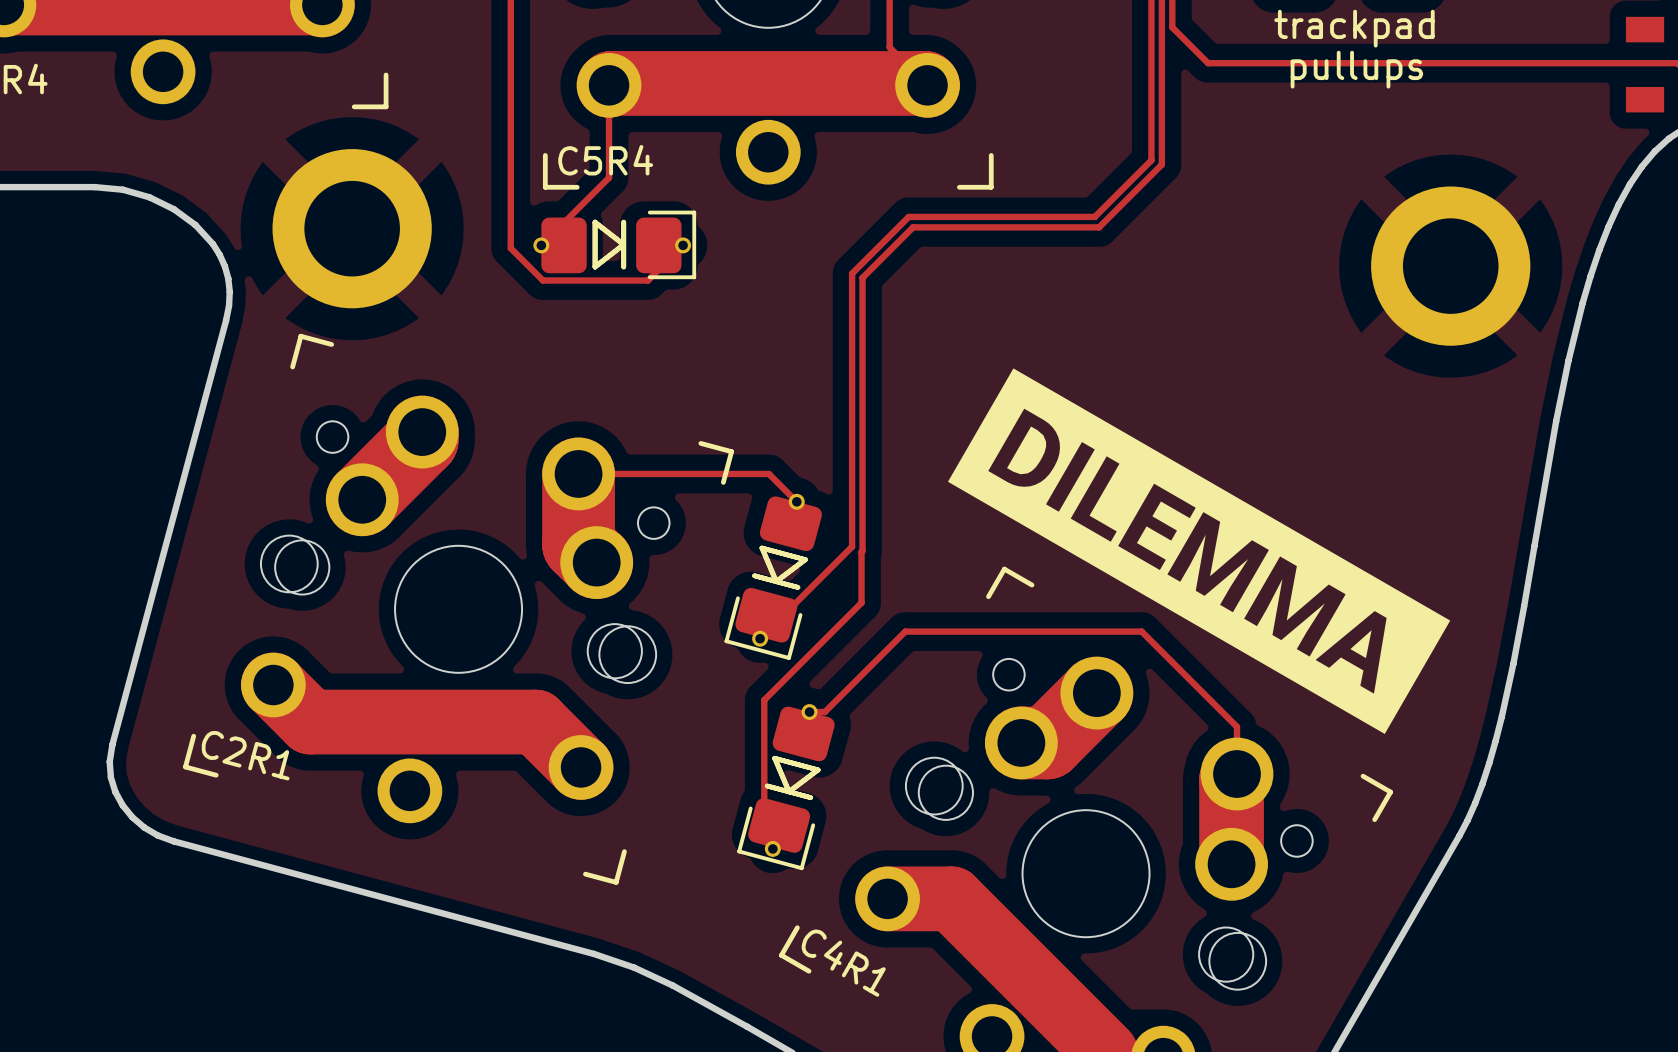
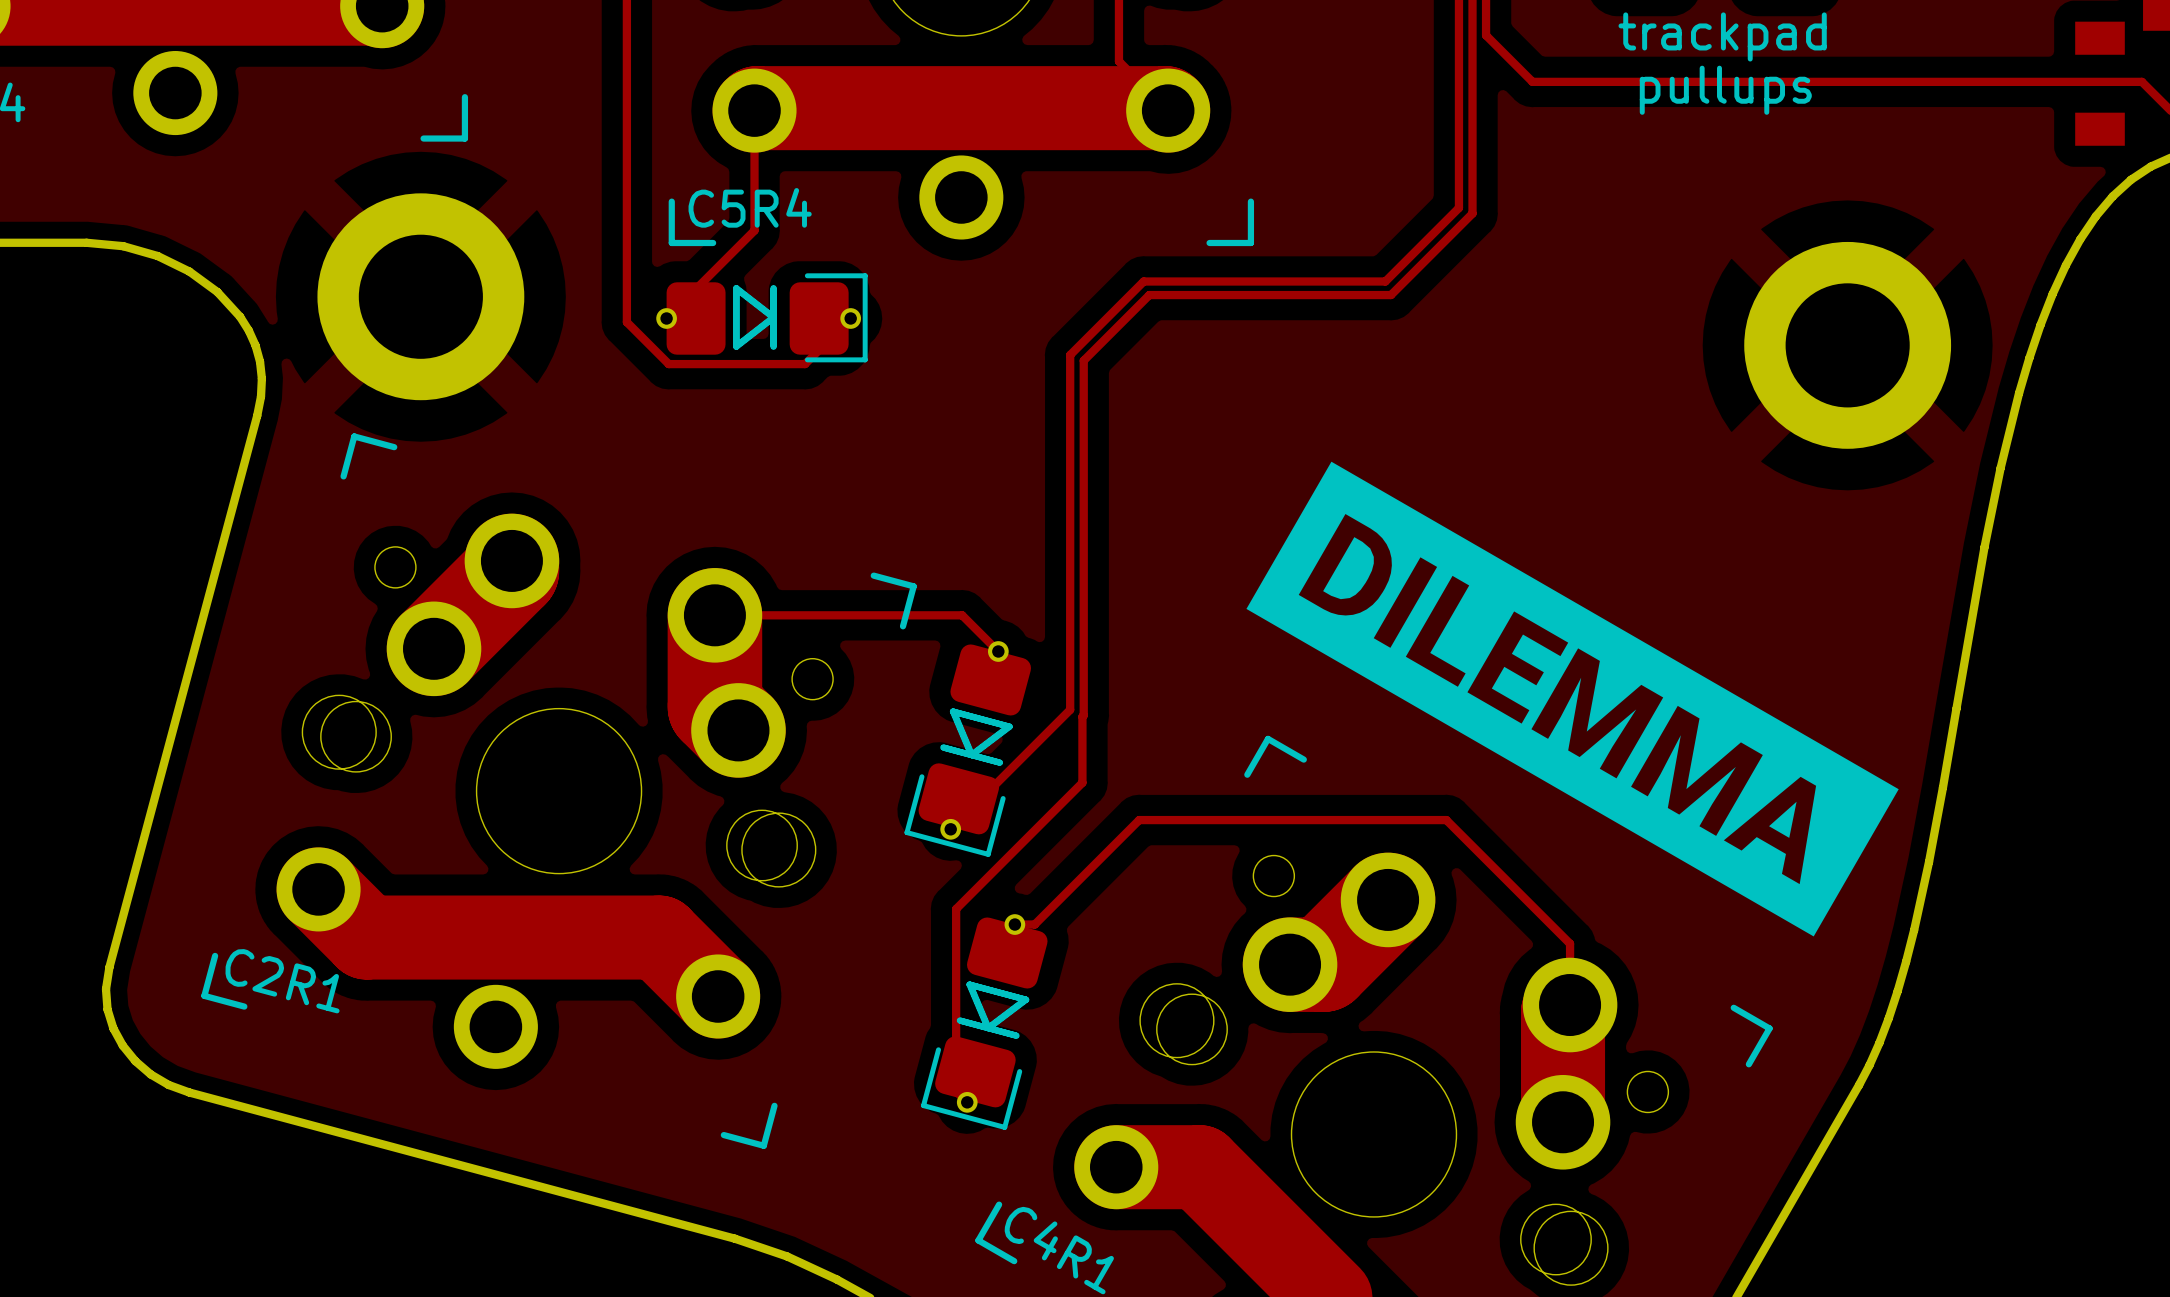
drawing position: (1199, 551) -> (1572, 699)

